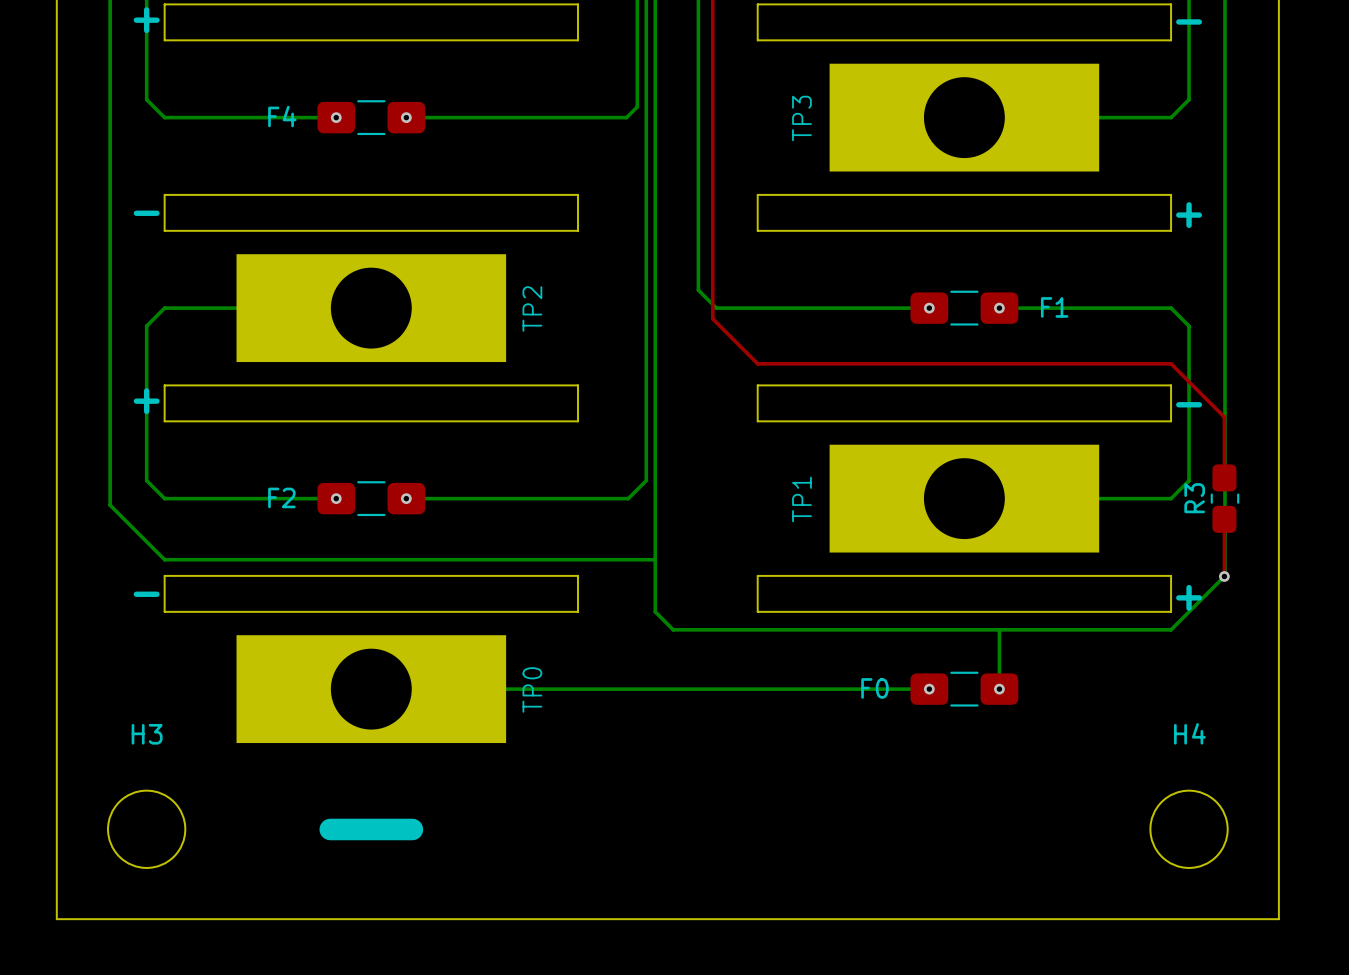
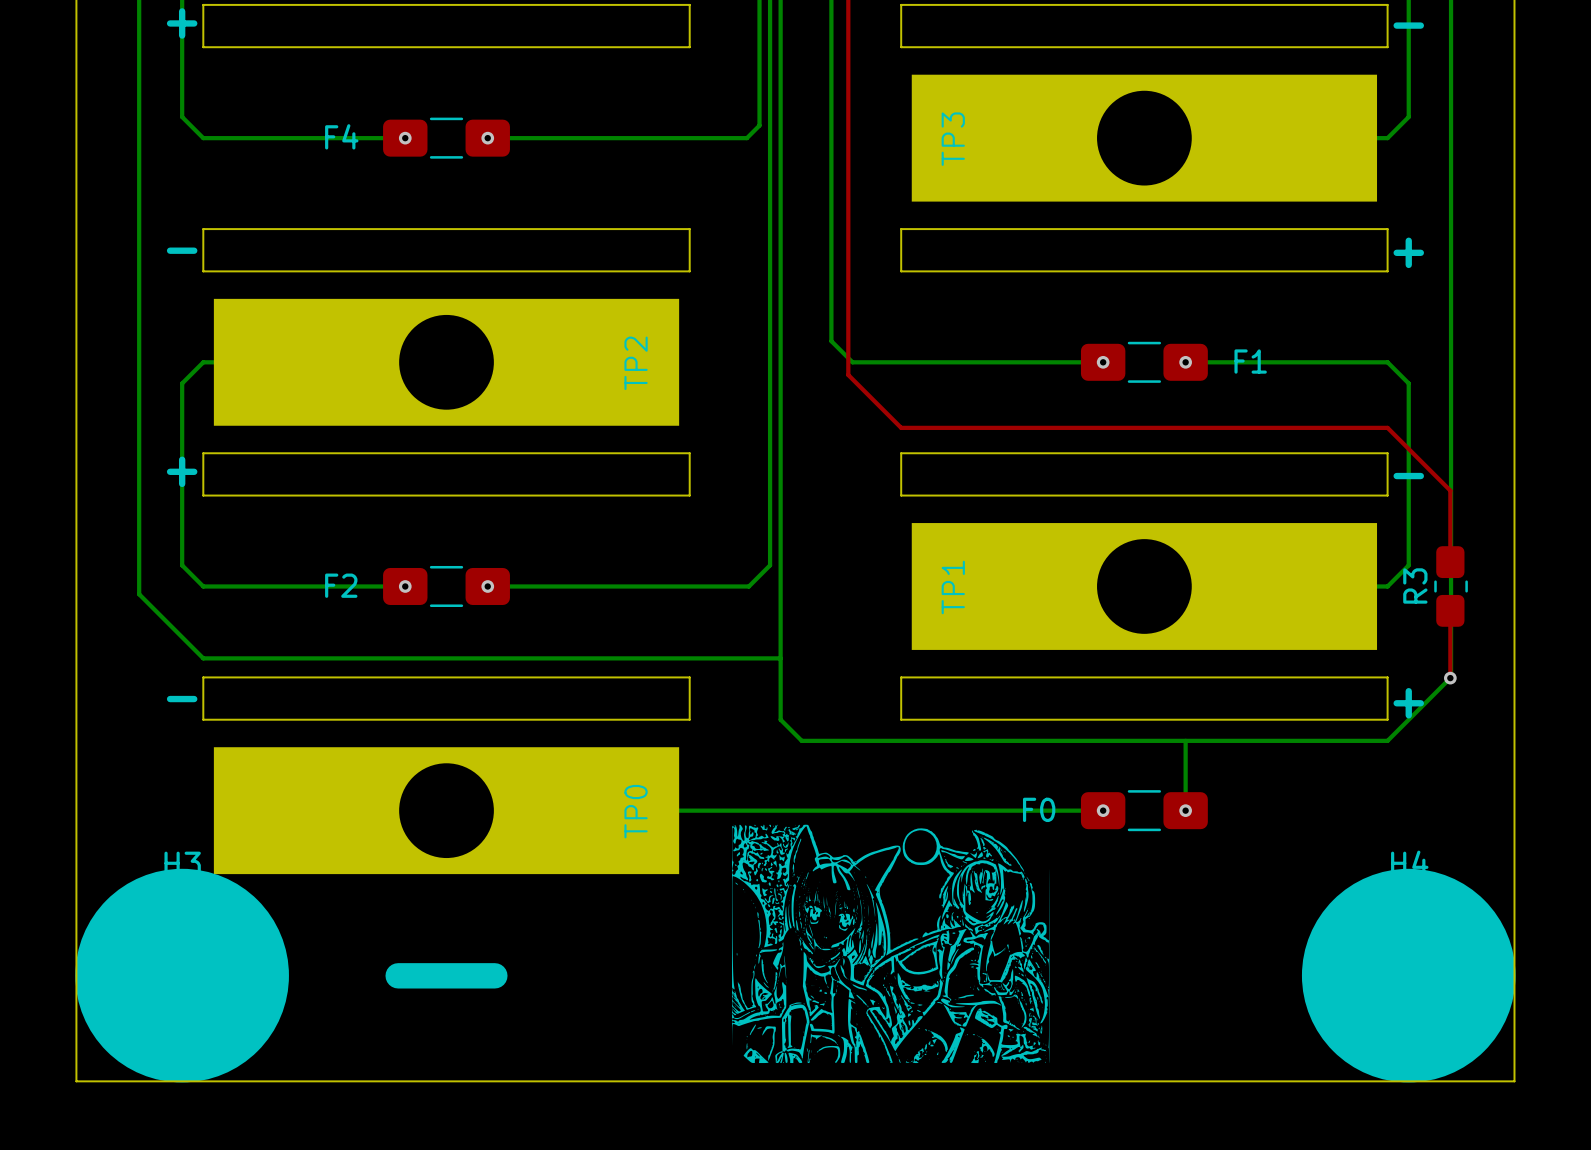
TP3 footprint: [829, 63, 1100, 172] -> [911, 74, 1378, 202]
TP2 footprint: [236, 254, 507, 363] -> [213, 298, 680, 426]
TP1 footprint: [829, 444, 1100, 553] -> [911, 523, 1378, 650]
TP0 footprint: [236, 635, 507, 744] -> [213, 747, 680, 875]
drawing: none -> [731, 824, 1050, 1064]
drawing: none -> [75, 868, 289, 1083]
drawing: none -> [1301, 868, 1516, 1083]

